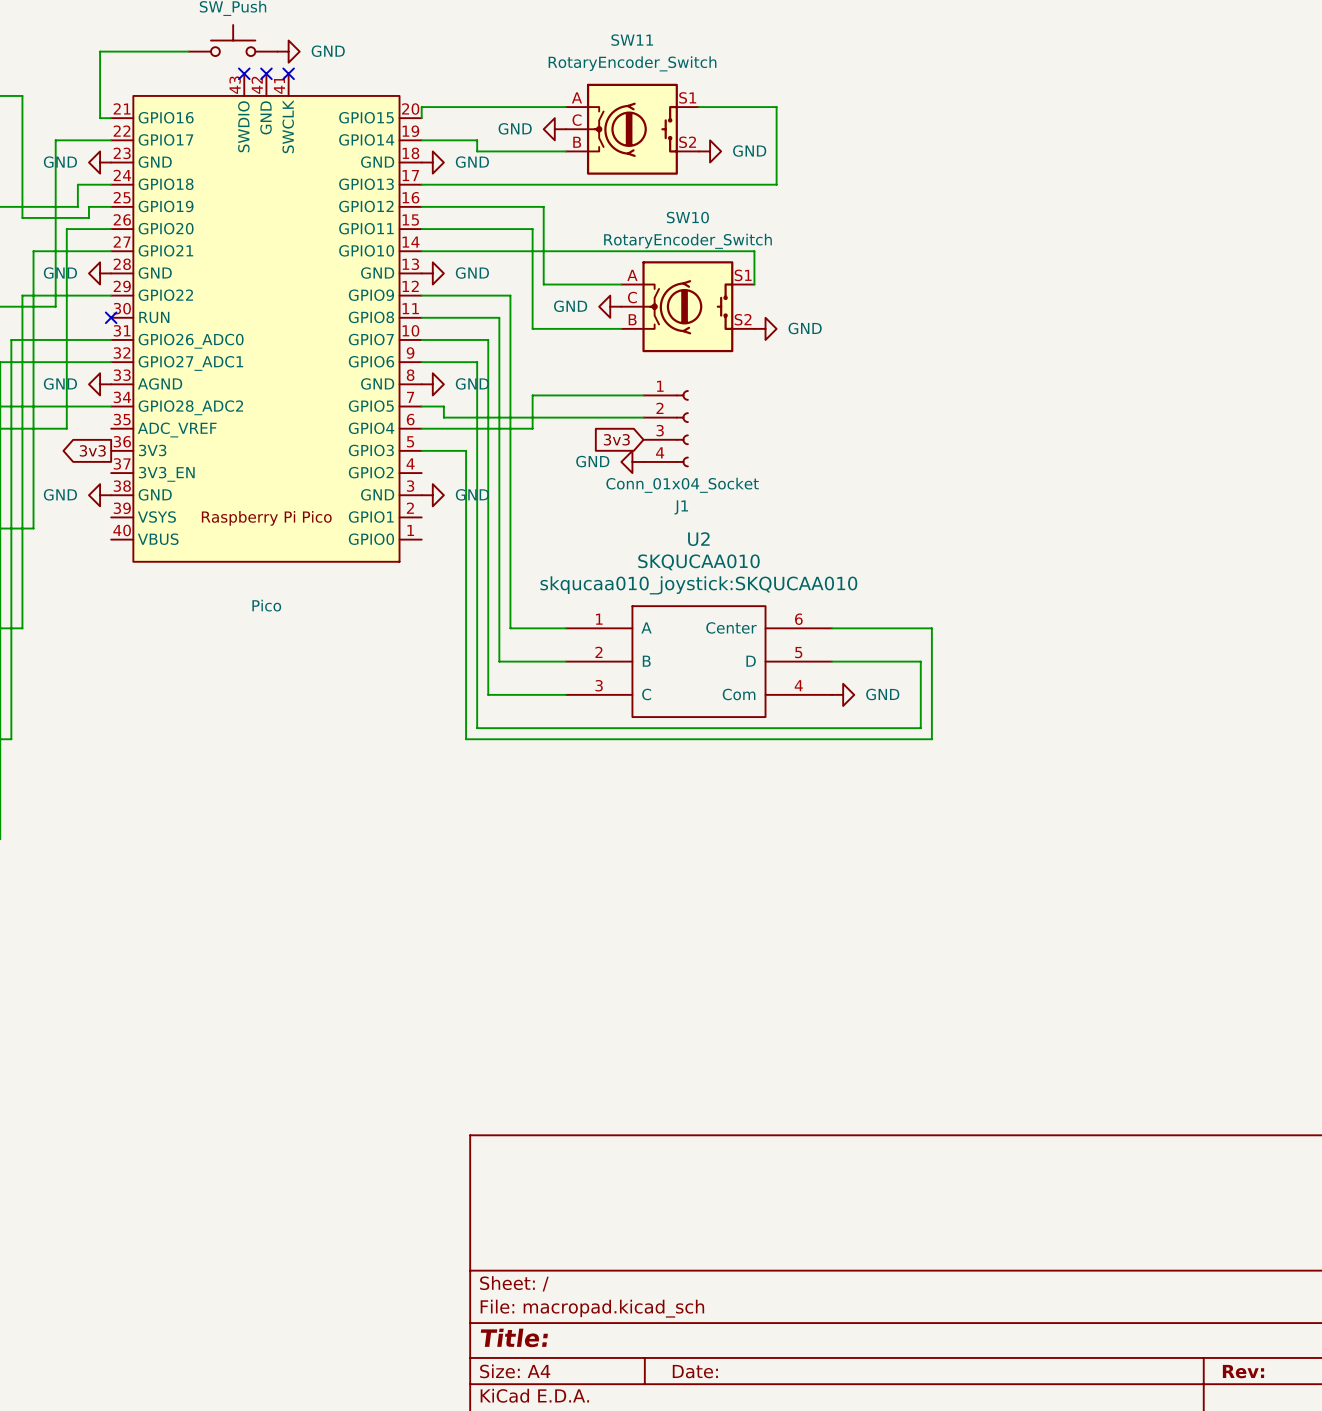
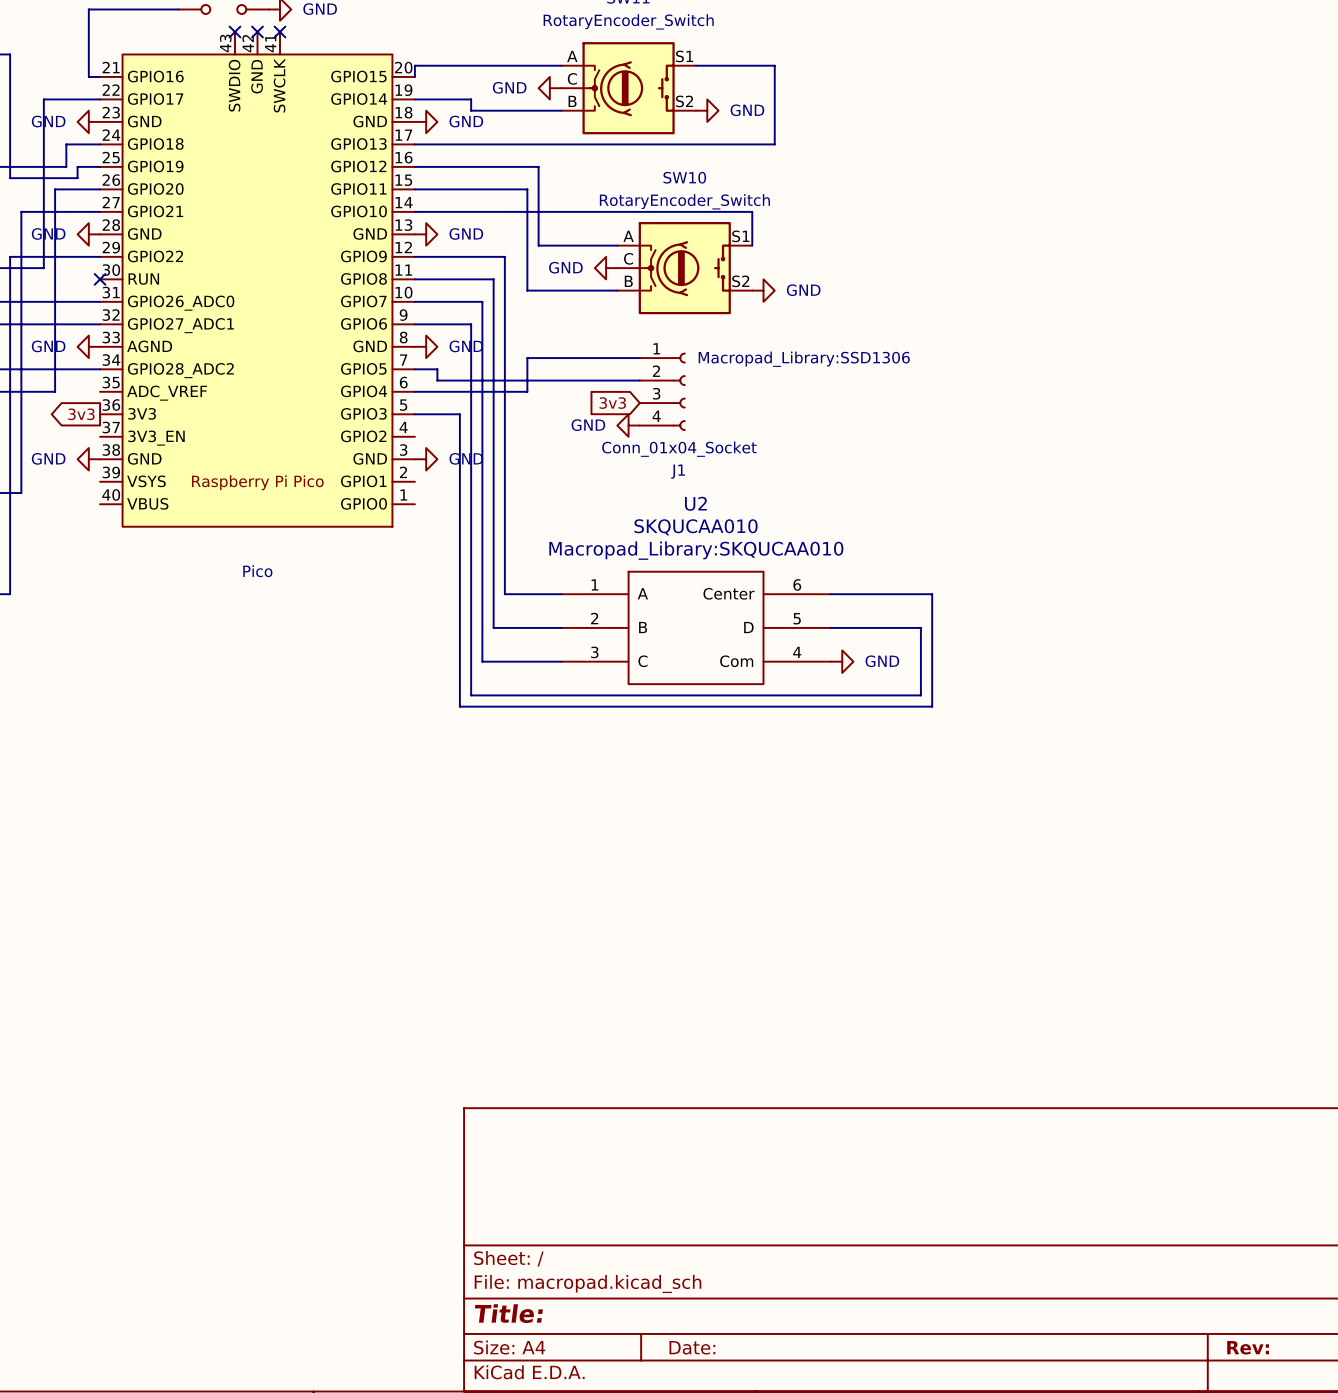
J1 text: none -> Macropad_Library:SSD1306 (804, 359)
U2 text: skqucaa010_joystick:SKQUCAA010 (698, 585) -> Macropad_Library:SKQUCAA010 (696, 550)

